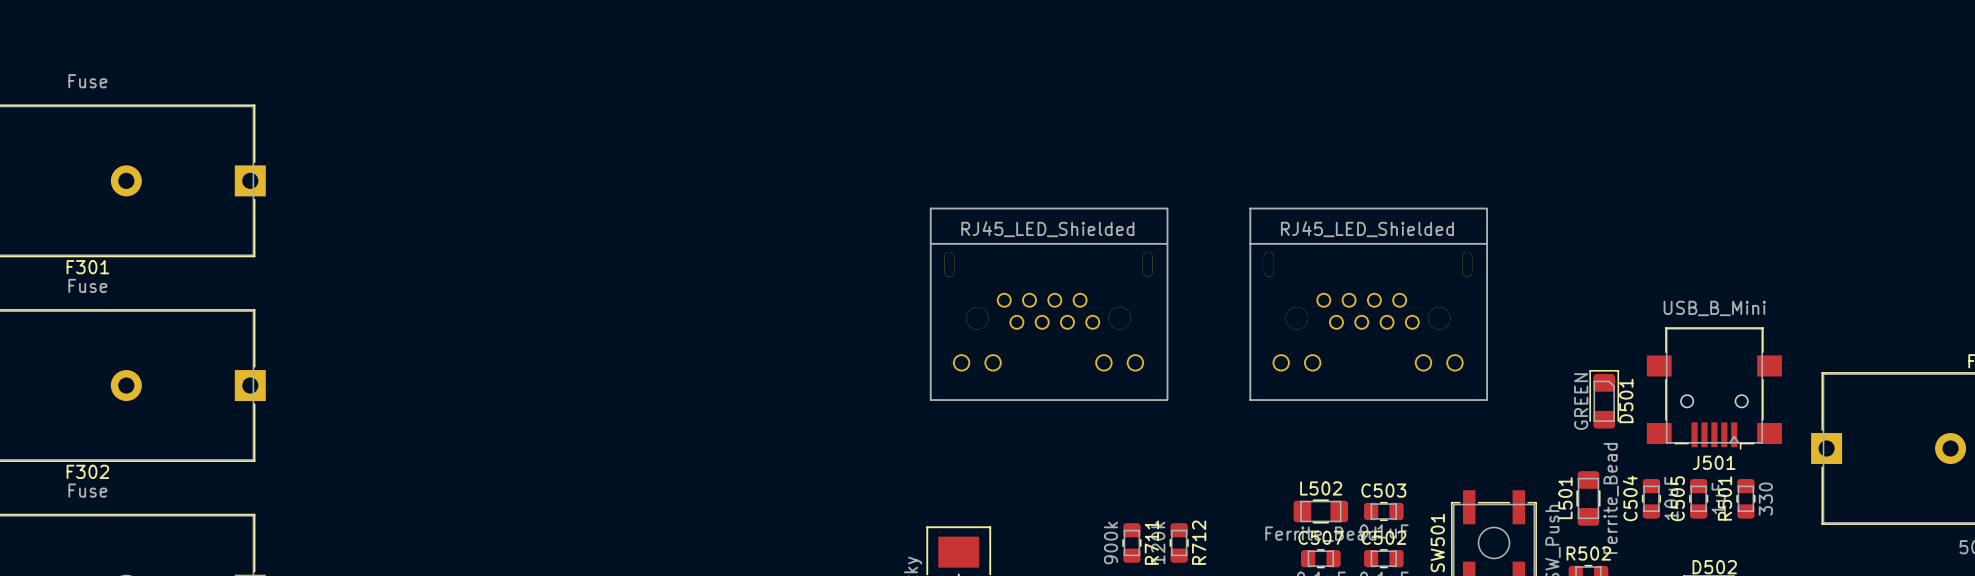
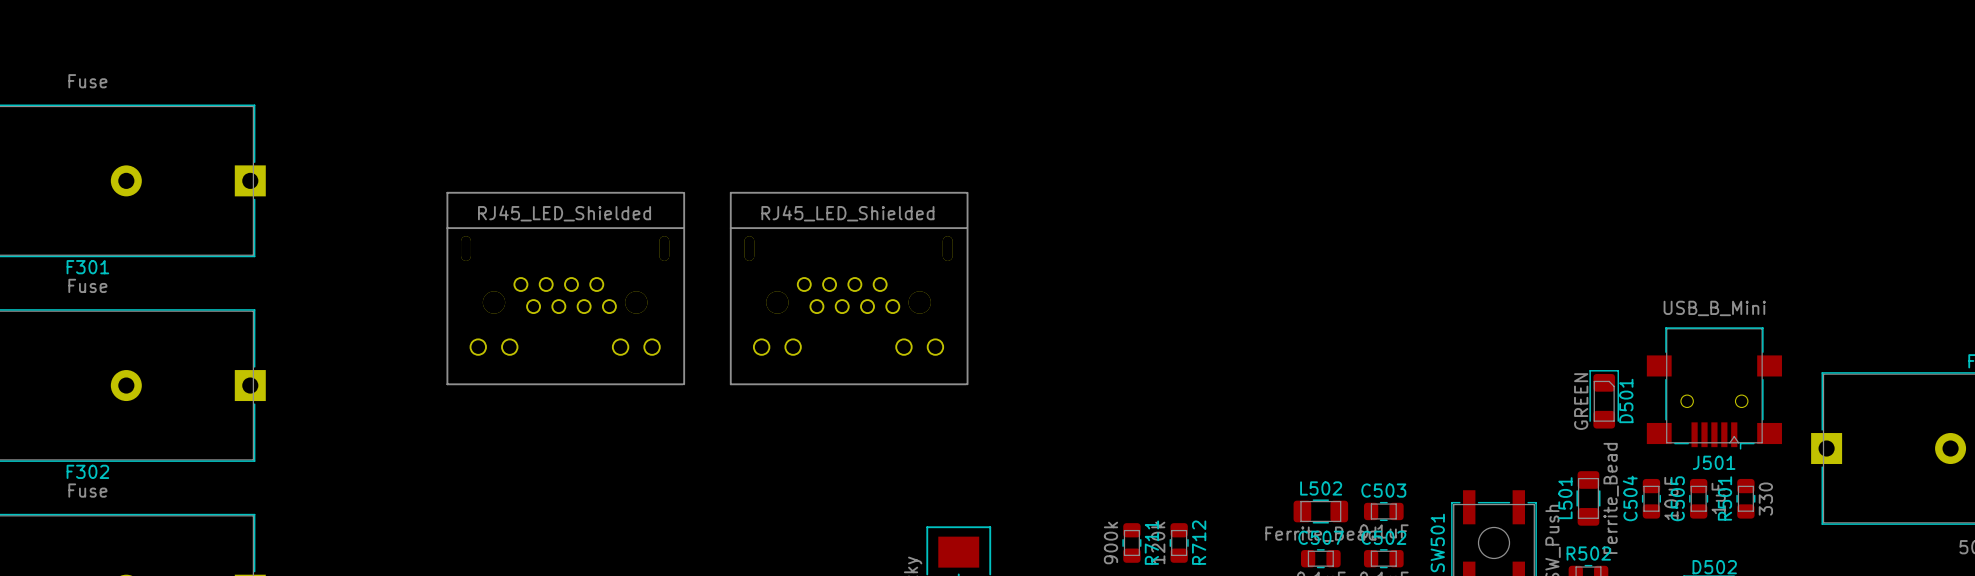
part: none -> RJ45_LED_Shielded (565, 288)
part position: (1049, 304) -> (849, 288)
part: RJ45_LED_Shielded (1368, 304) -> none

